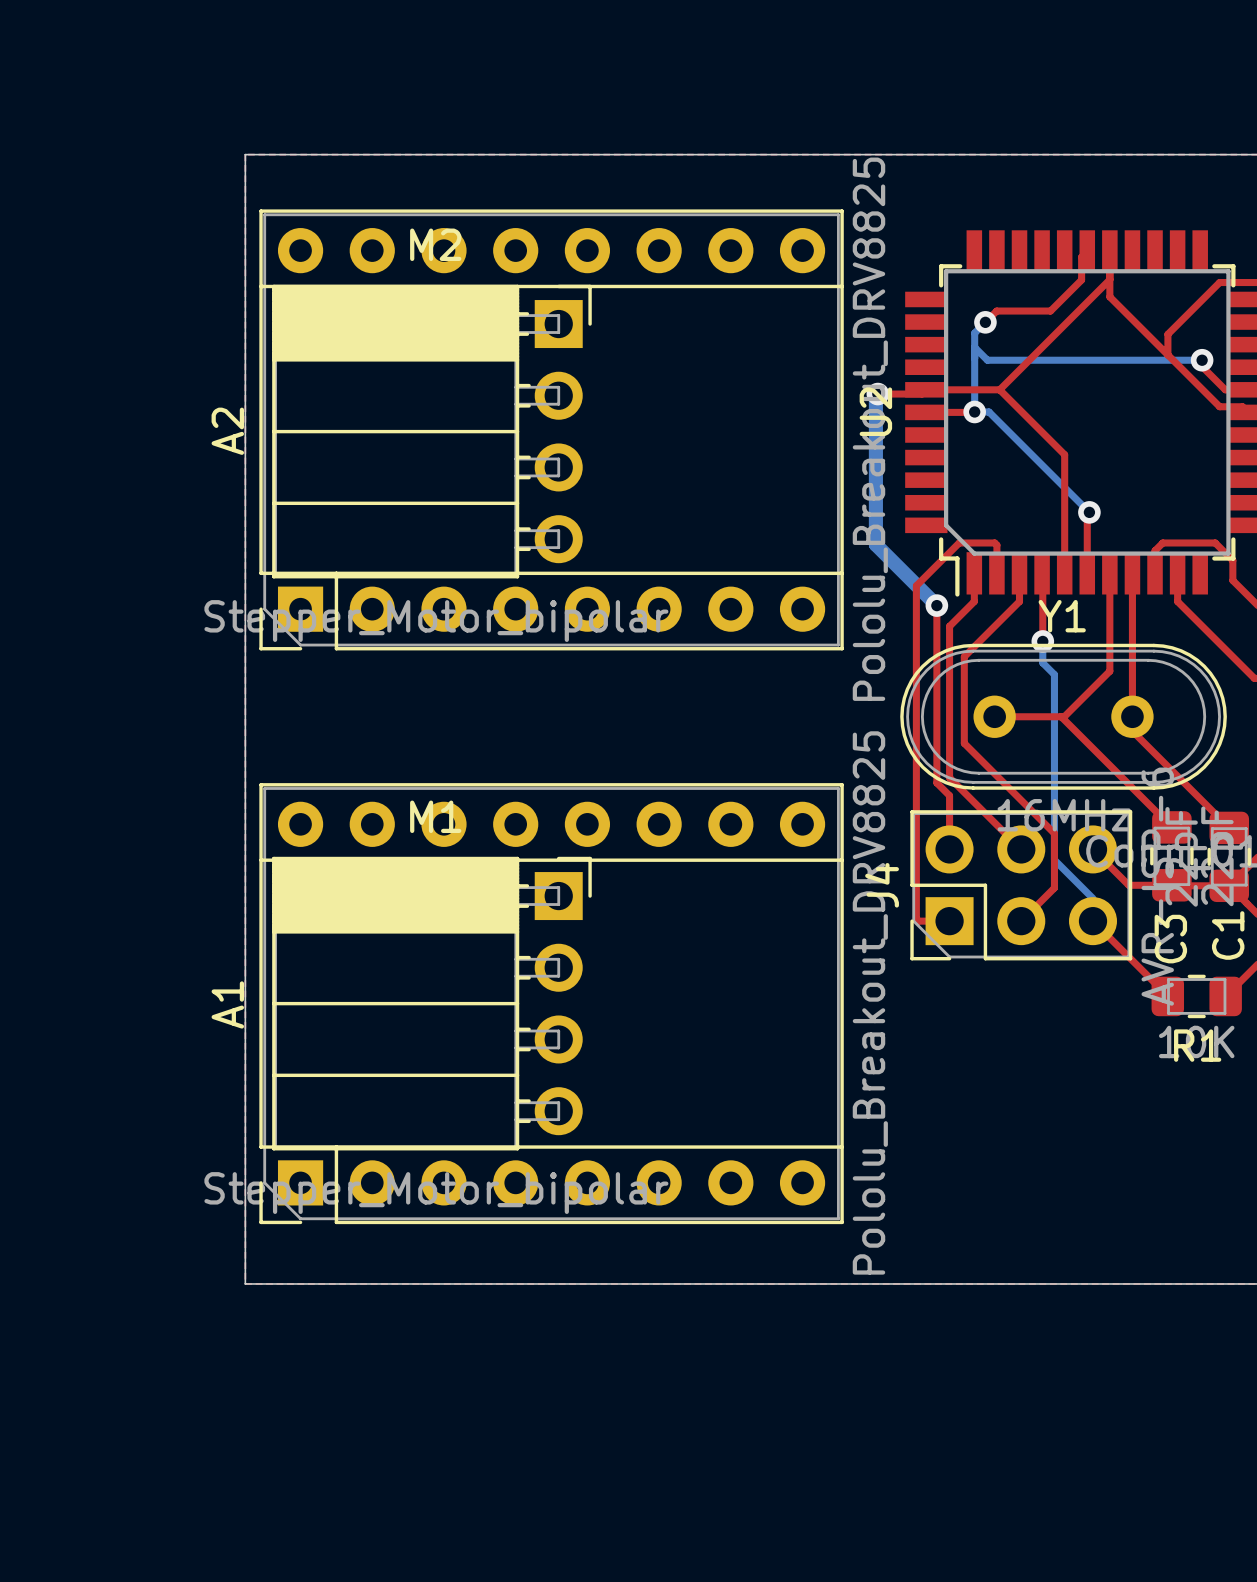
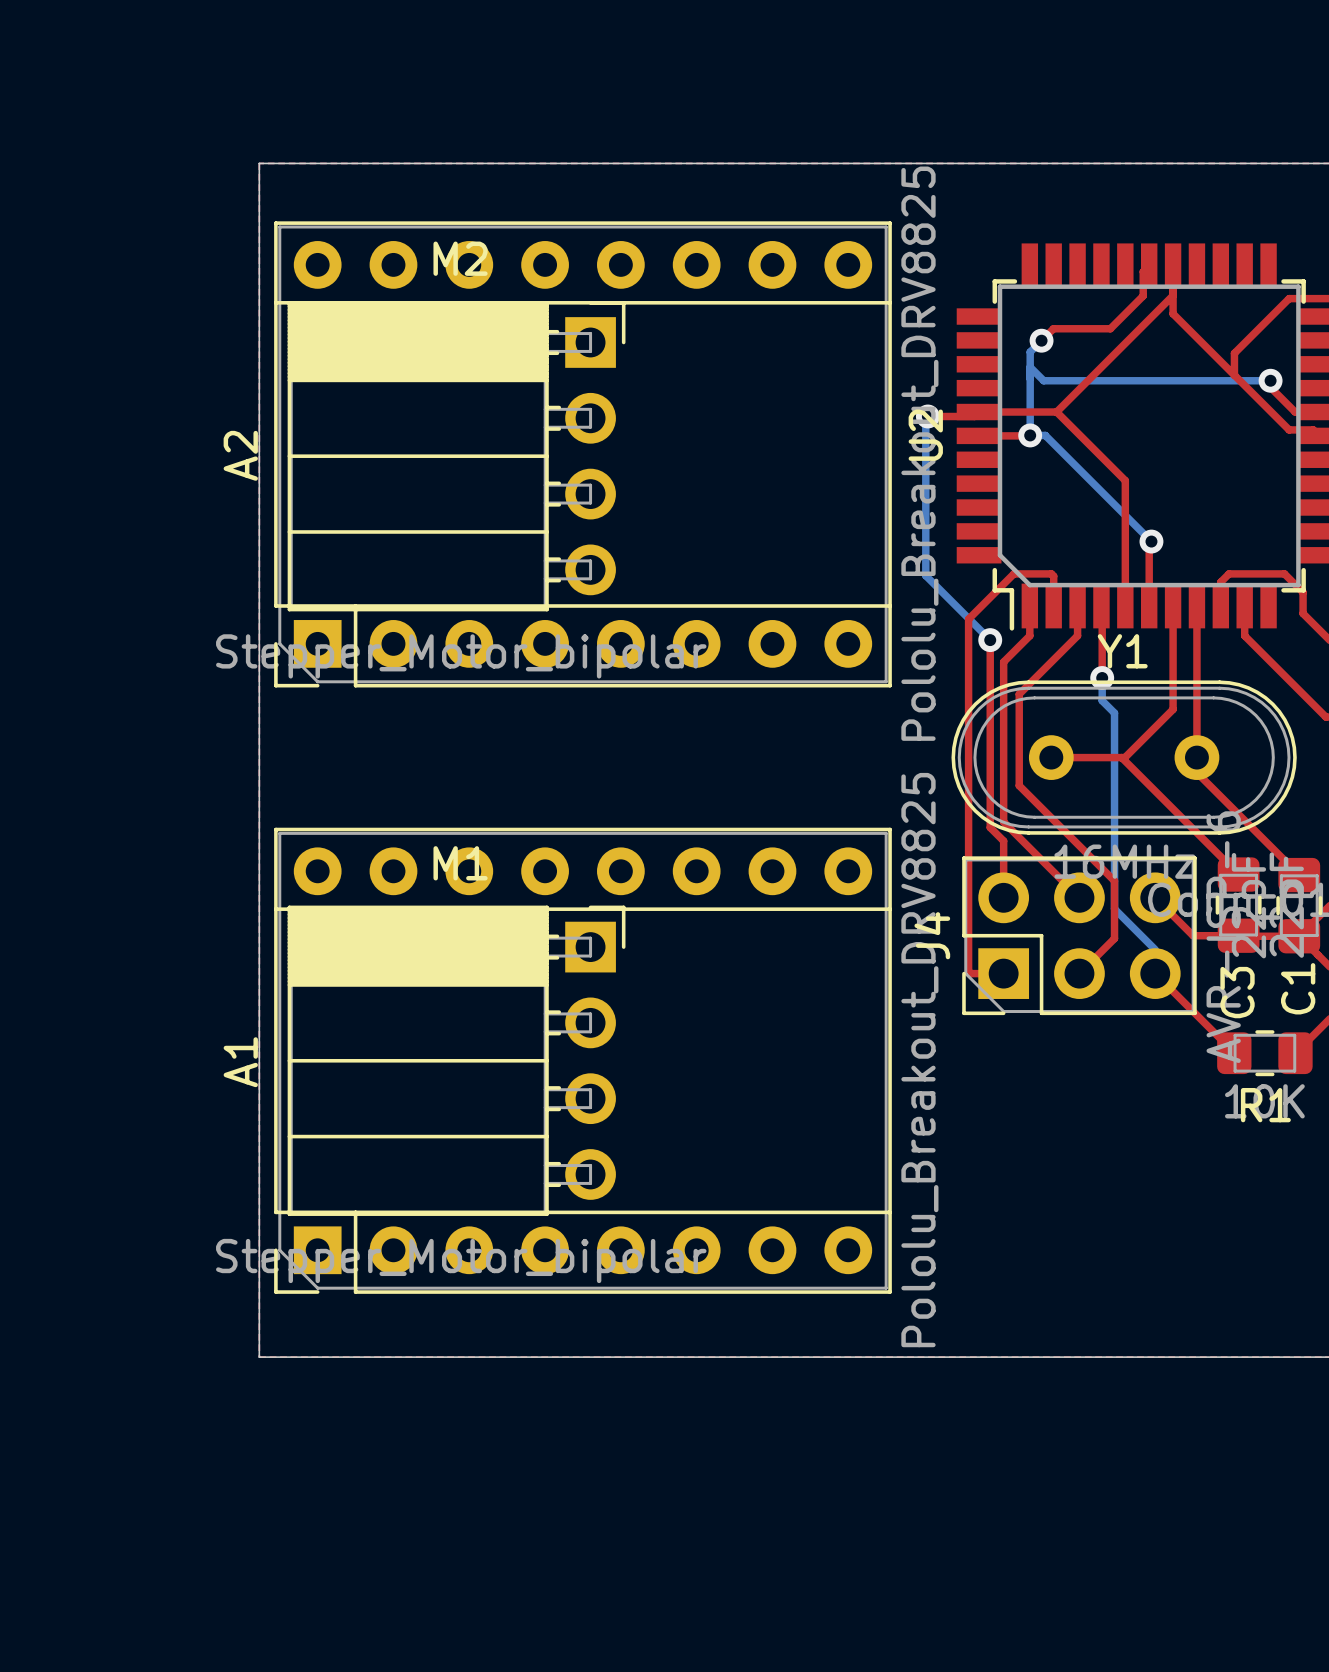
bottom track width: thick (875, 396) (875, 544) (936, 605) -> thin (925, 418) (925, 575) (990, 640)

